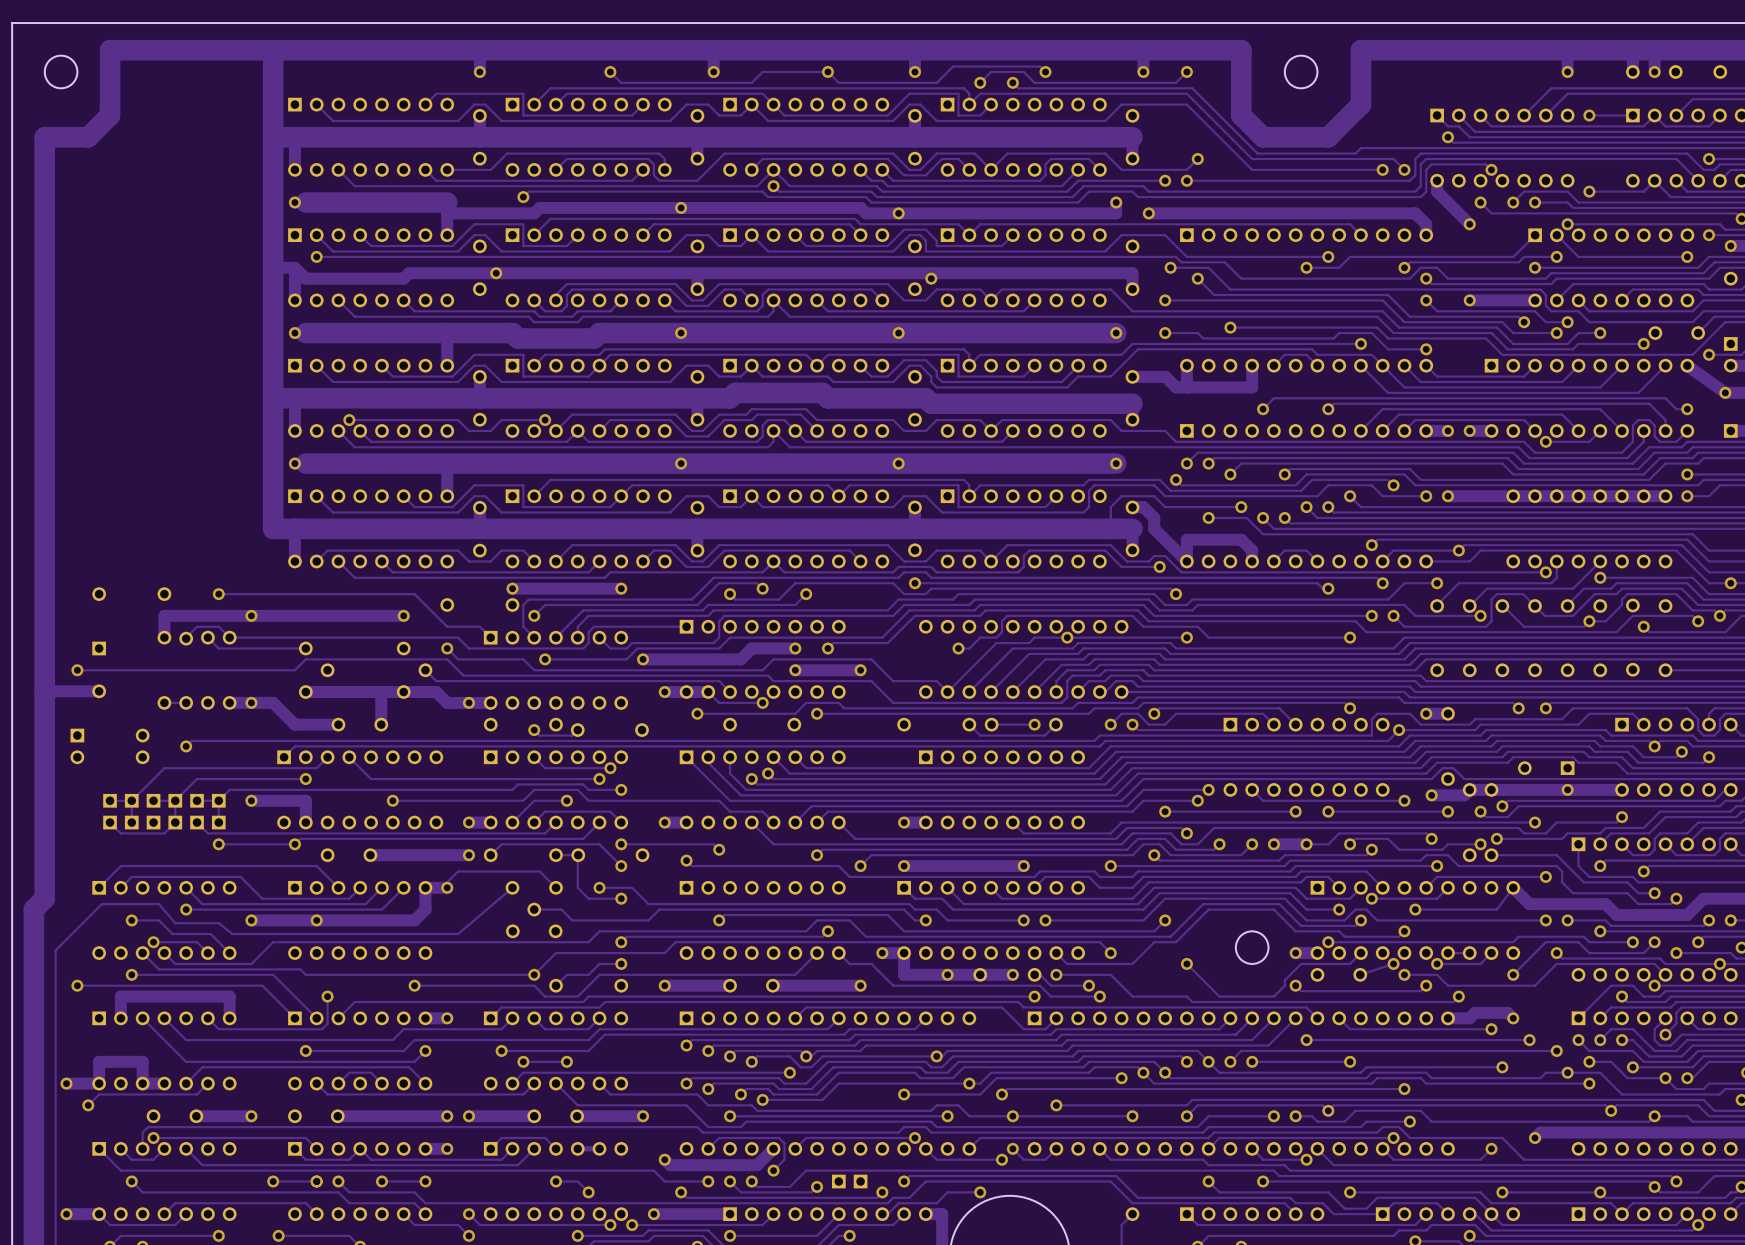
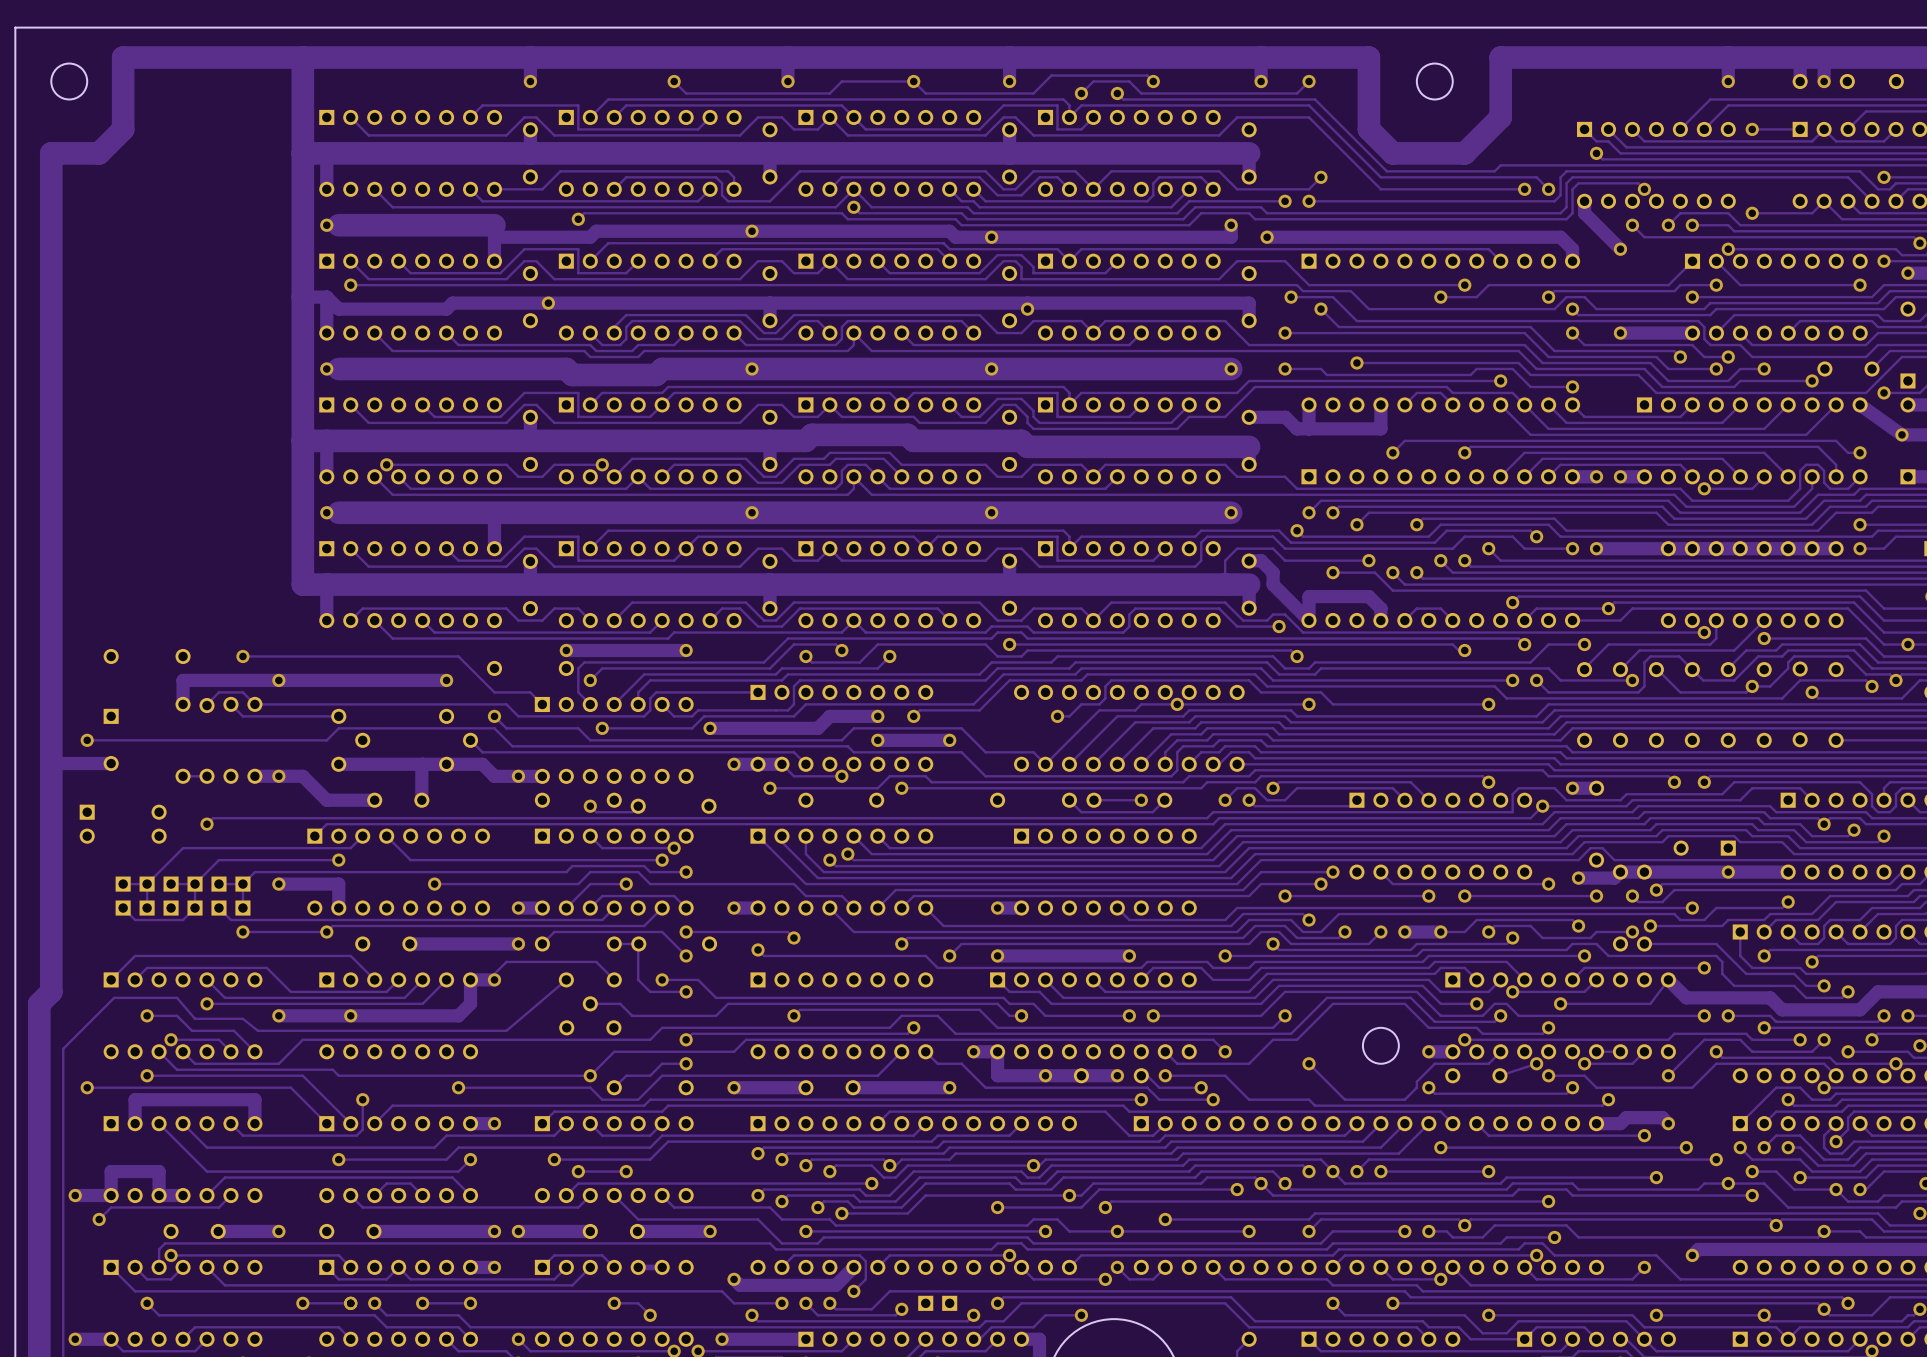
track: (447, 333) (447, 365) -> none

